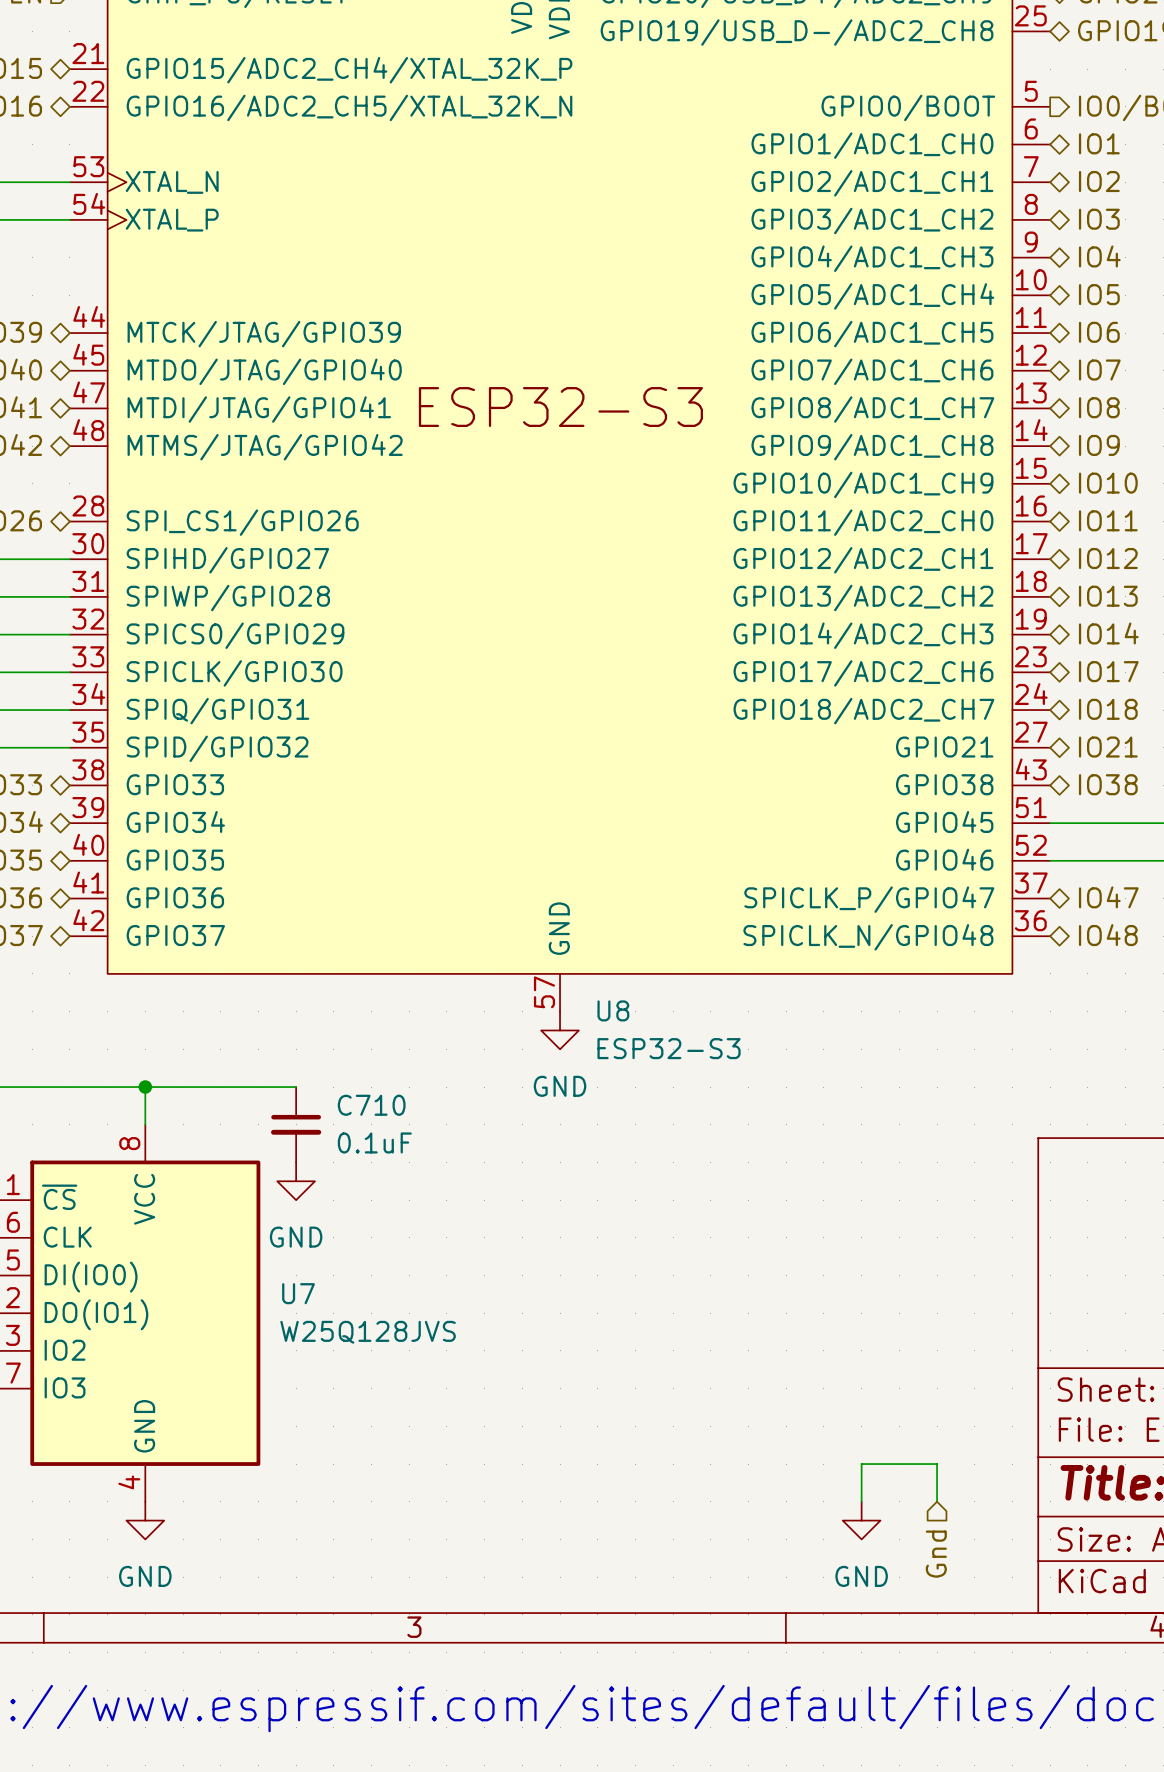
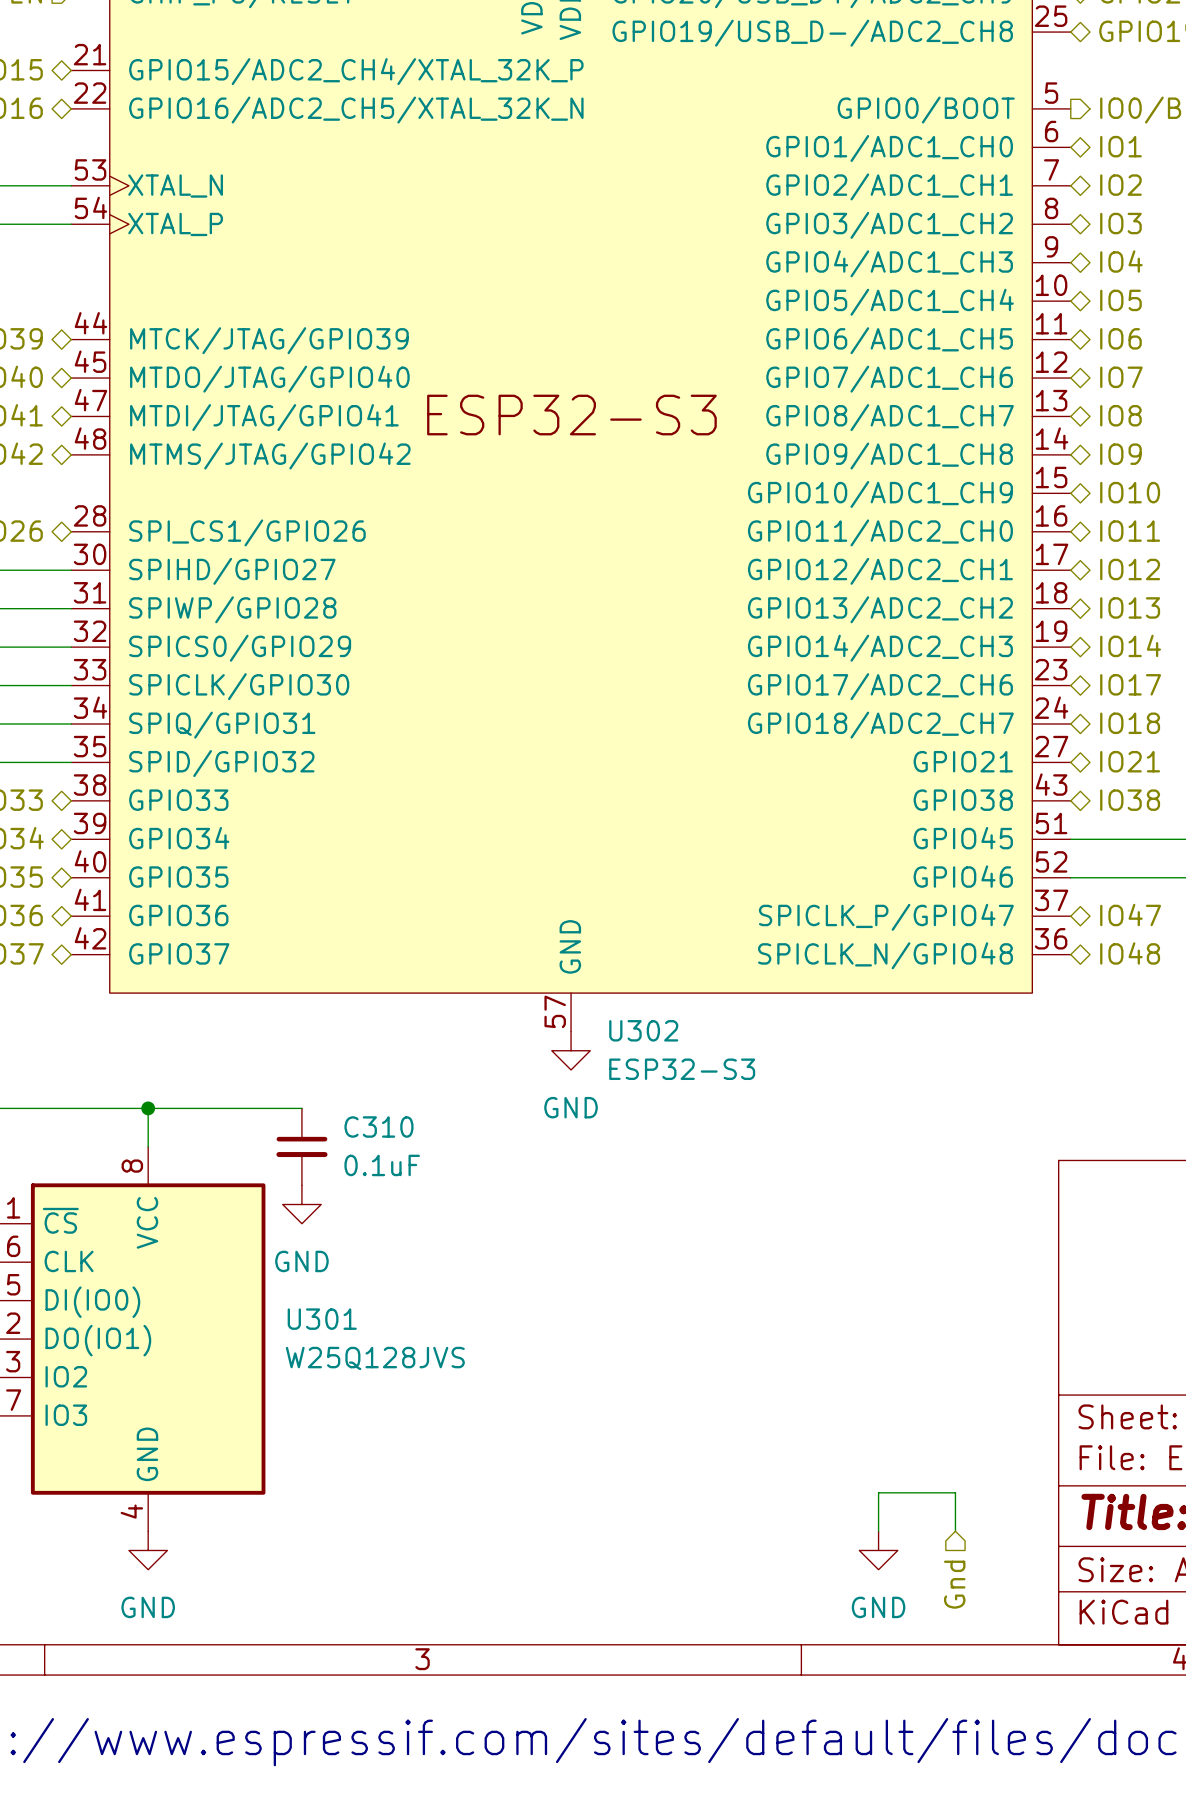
U8 name: U8 (613, 1010) -> U302 (643, 1030)
C710 name: C710 (371, 1105) -> C310 (378, 1127)
U7 name: U7 (298, 1293) -> U301 (322, 1319)

